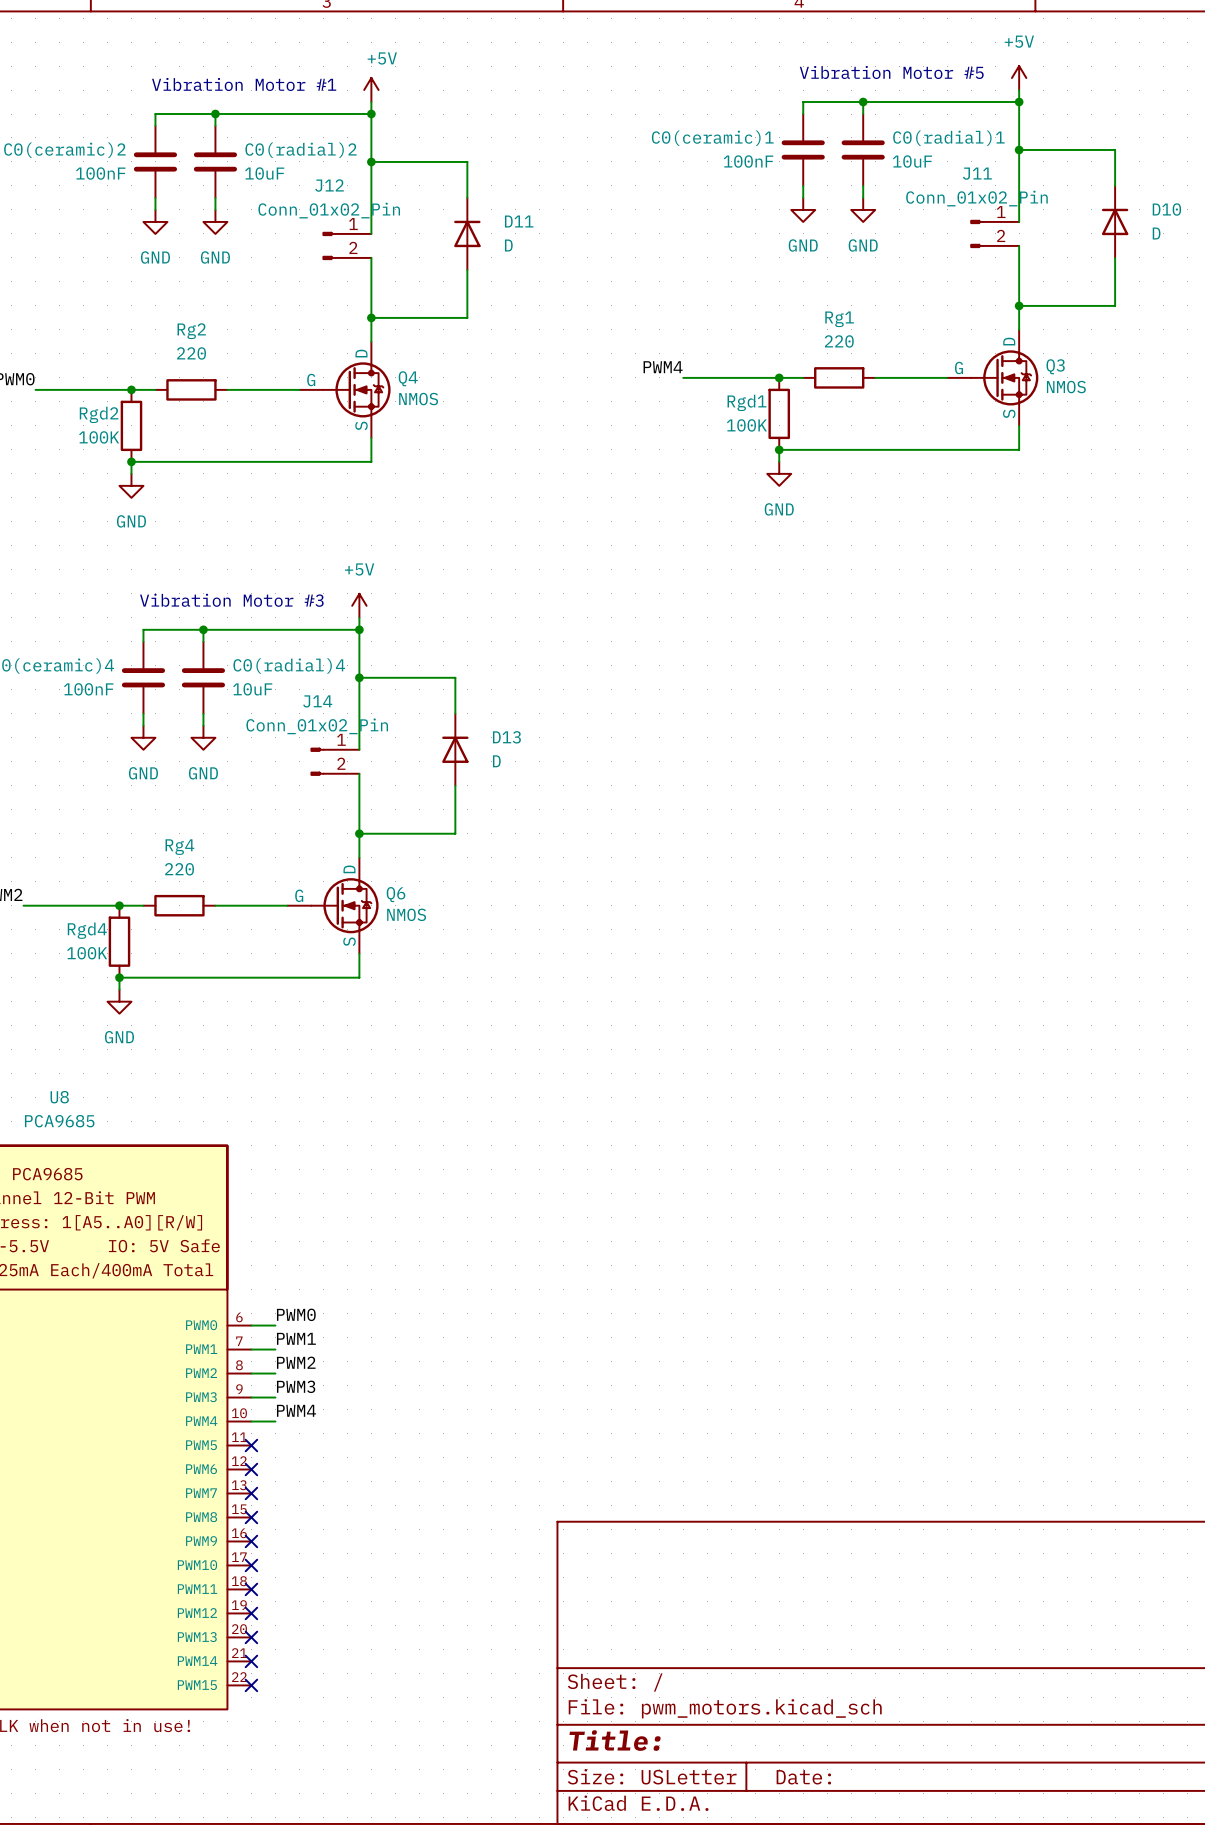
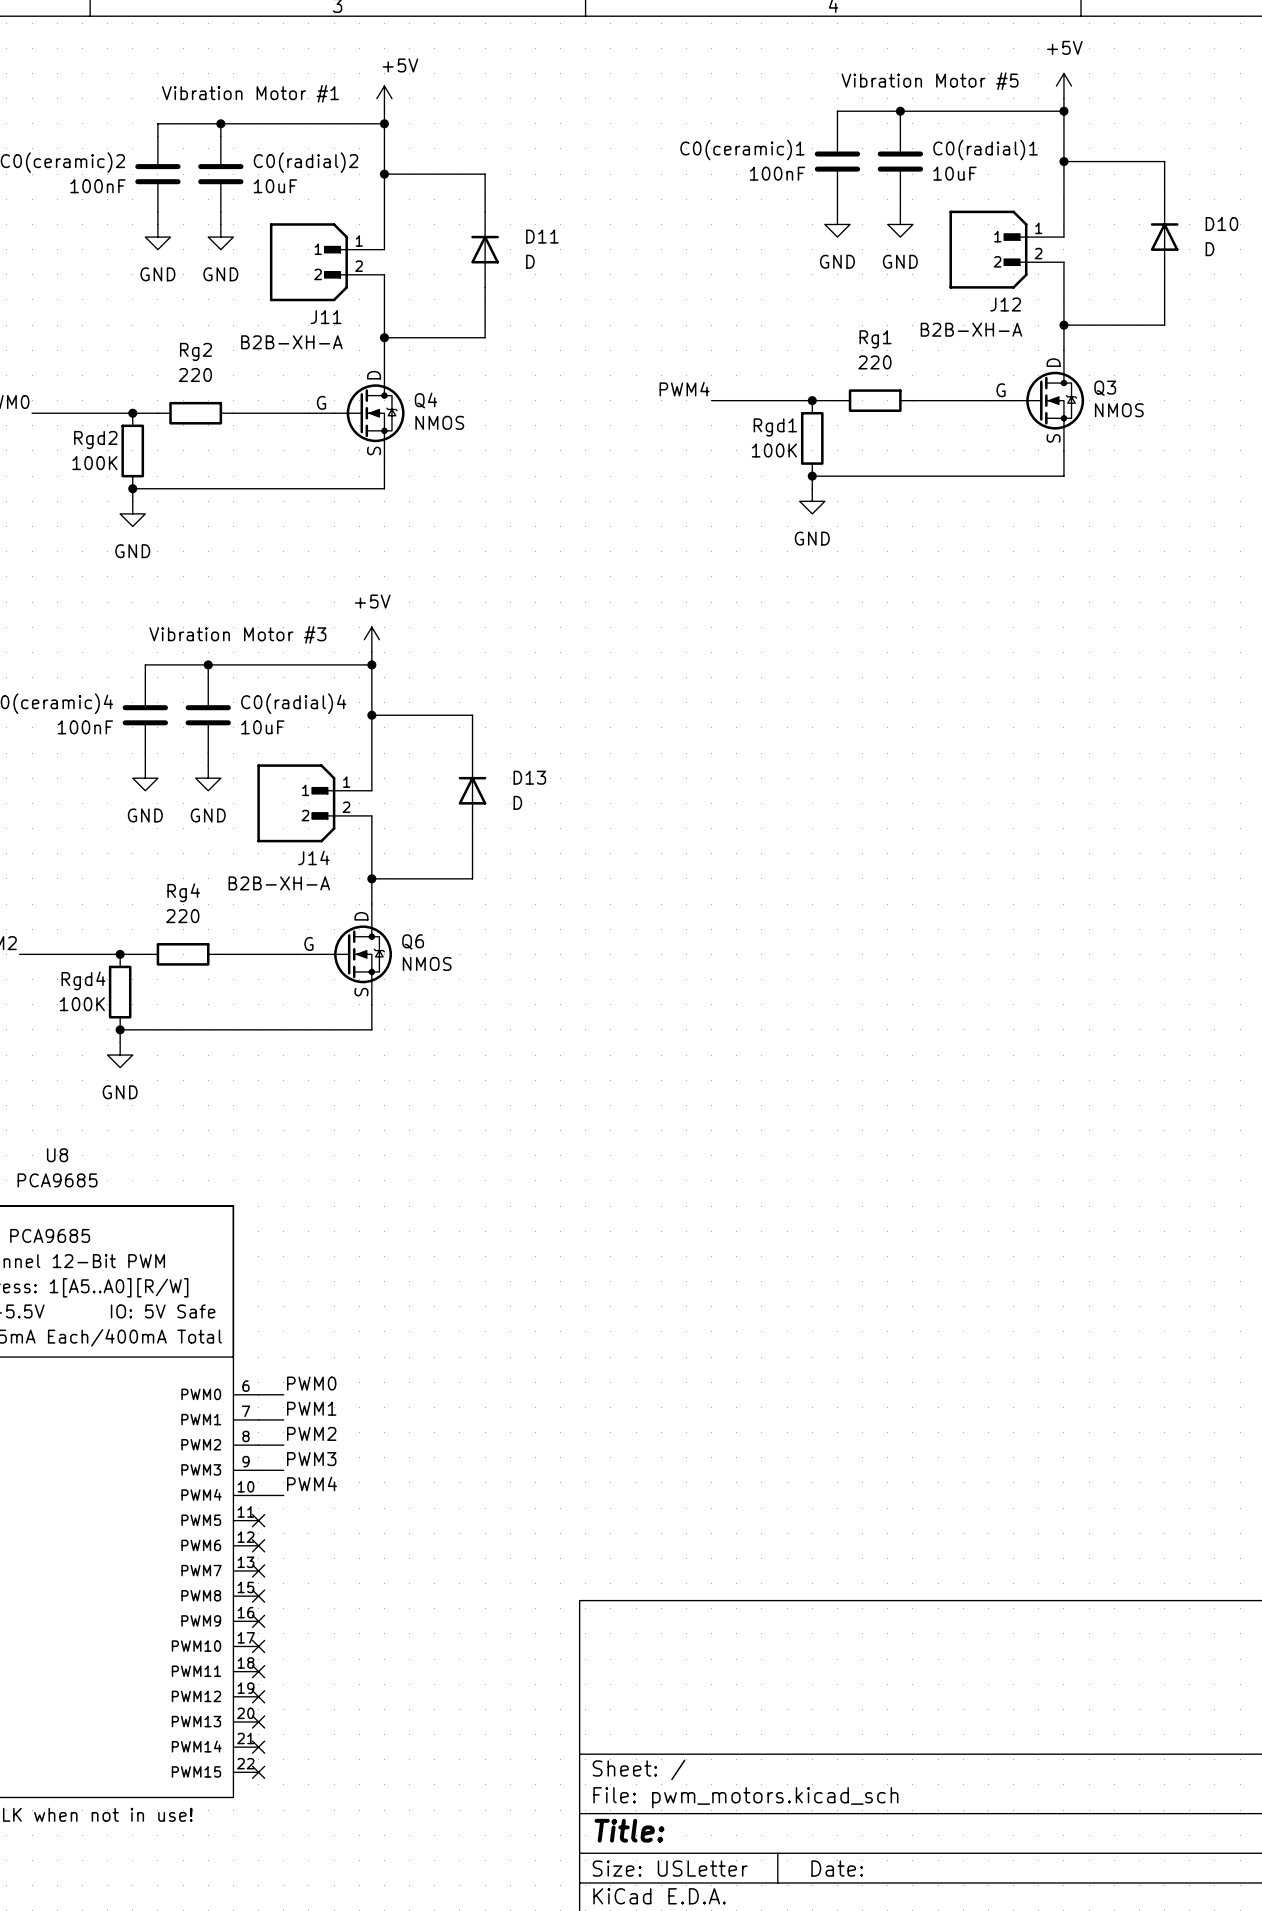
J11 name position: J11 (977, 173) -> J11 (326, 317)
J12 name position: J12 (329, 185) -> J12 (1005, 304)
J11 value: Conn_01x02_Pin (976, 198) -> B2B-XH-A (291, 342)
J12 value: Conn_01x02_Pin (329, 210) -> B2B-XH-A (971, 329)
J11 symbol: [970, 220, 1020, 248] -> [269, 223, 385, 302]
J12 symbol: [322, 232, 372, 260] -> [949, 210, 1064, 289]
J14 name position: J14 (317, 701) -> J14 (313, 857)
J14 value: Conn_01x02_Pin (317, 726) -> B2B-XH-A (279, 883)
J14 symbol: [310, 747, 360, 776] -> [257, 764, 372, 843]

